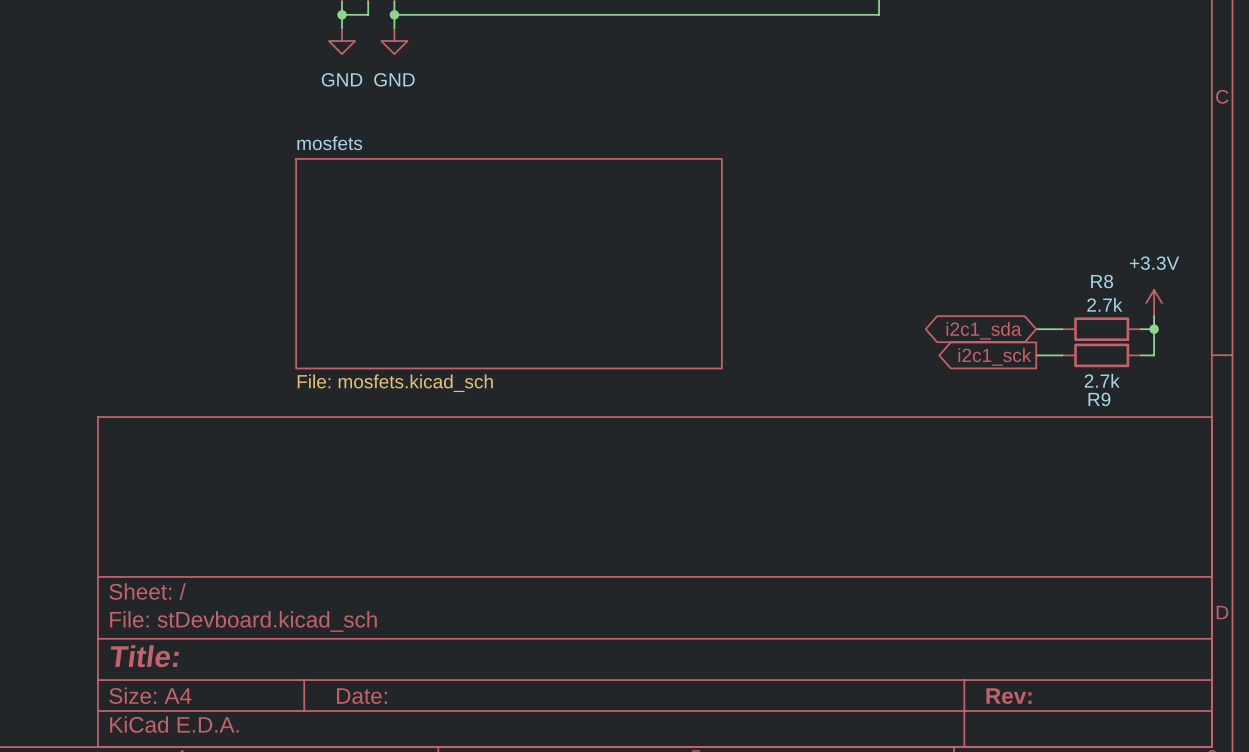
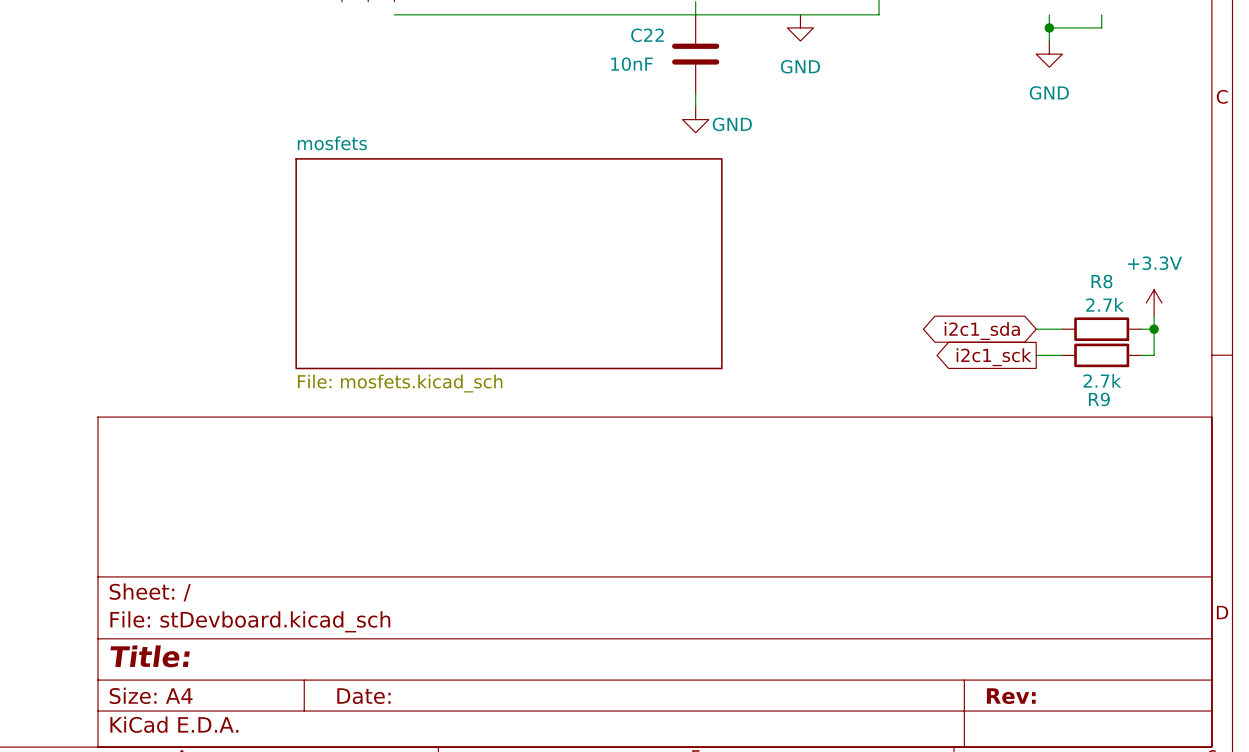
wire: (342, 1) (342, 27) -> none
wire: (368, 1) (368, 14) (342, 14) -> none
wire: (394, 1) (394, 27) -> none
wire: none -> (695, 1) (695, 14)
junction: (342, 14) -> none
junction: (394, 14) -> none
wire: none -> (1049, 14) (1049, 41)
wire: none -> (1101, 14) (1101, 27) (1049, 27)
power symbol: none -> GND (800, 27)
junction: none -> (1049, 27)
power symbol: GND (342, 41) -> none
power symbol: GND (394, 41) -> none
C22: none -> 10nF (695, 54)
power symbol: none -> GND (1049, 54)
wire: none -> (695, 93) (695, 106)
power symbol: none -> GND (695, 119)

